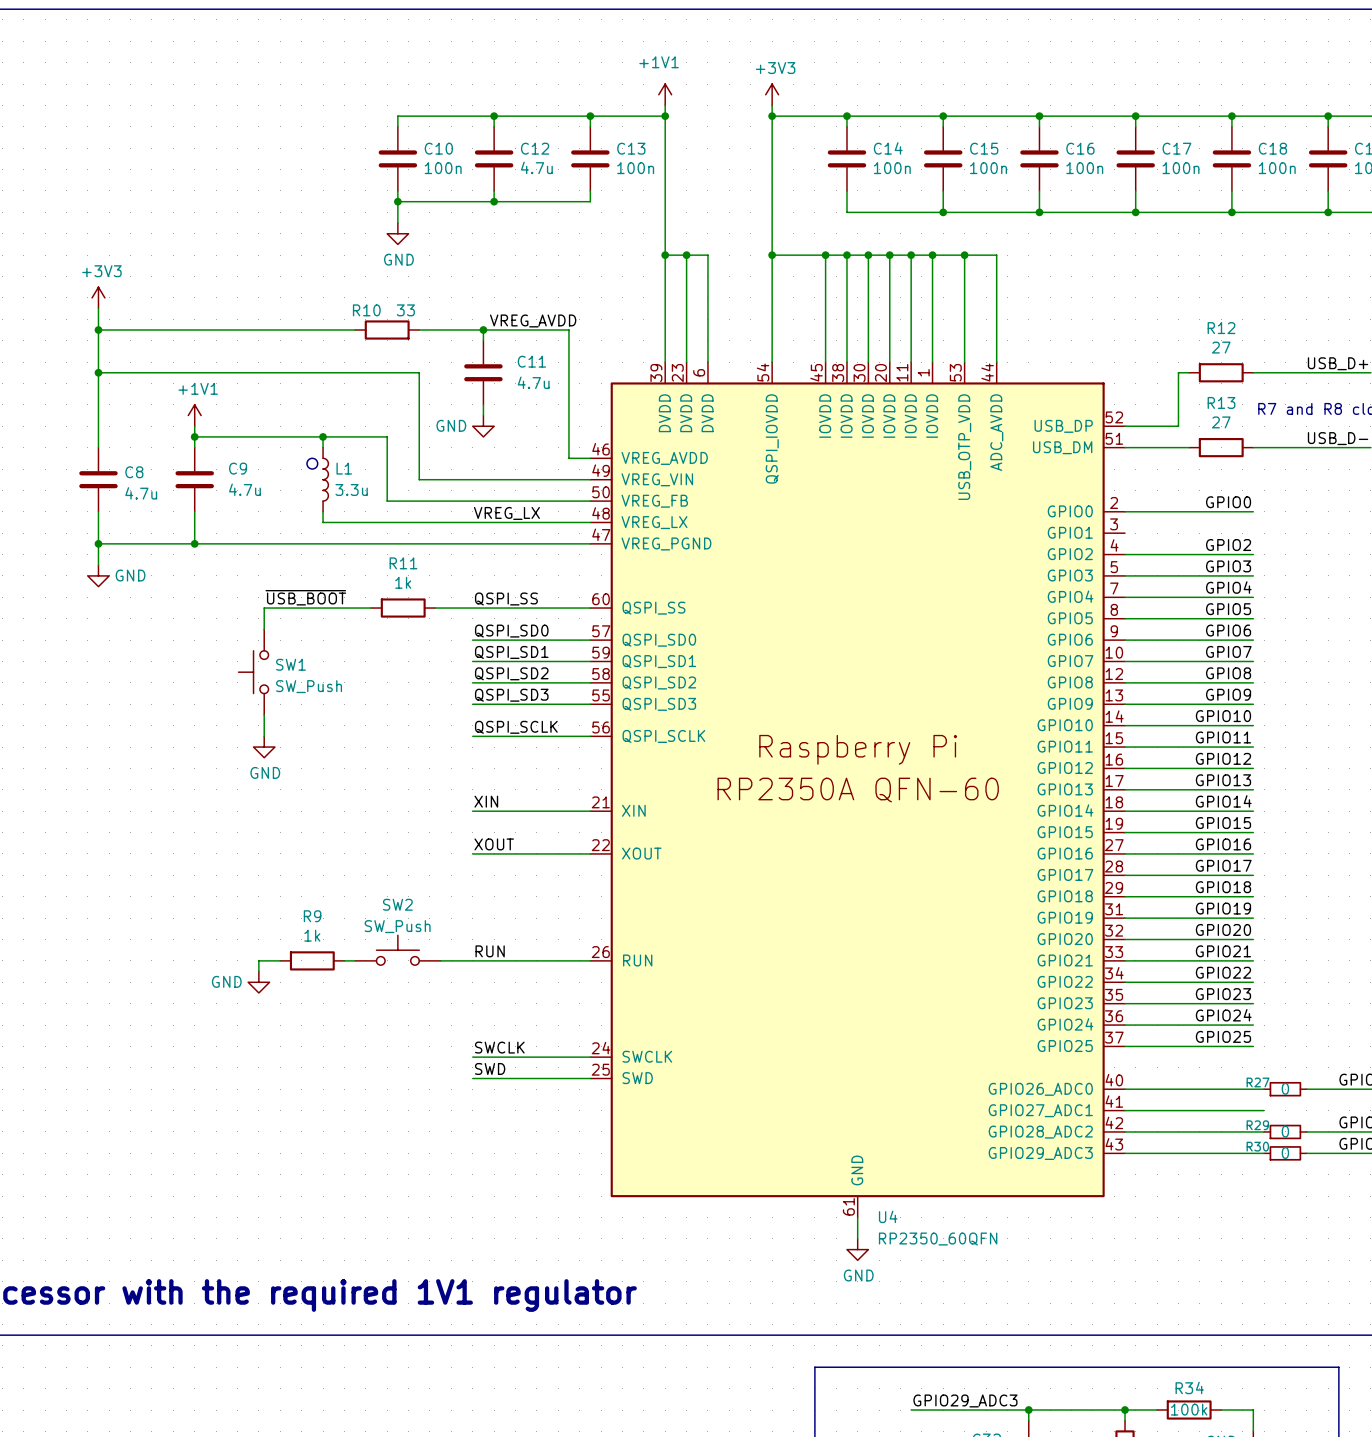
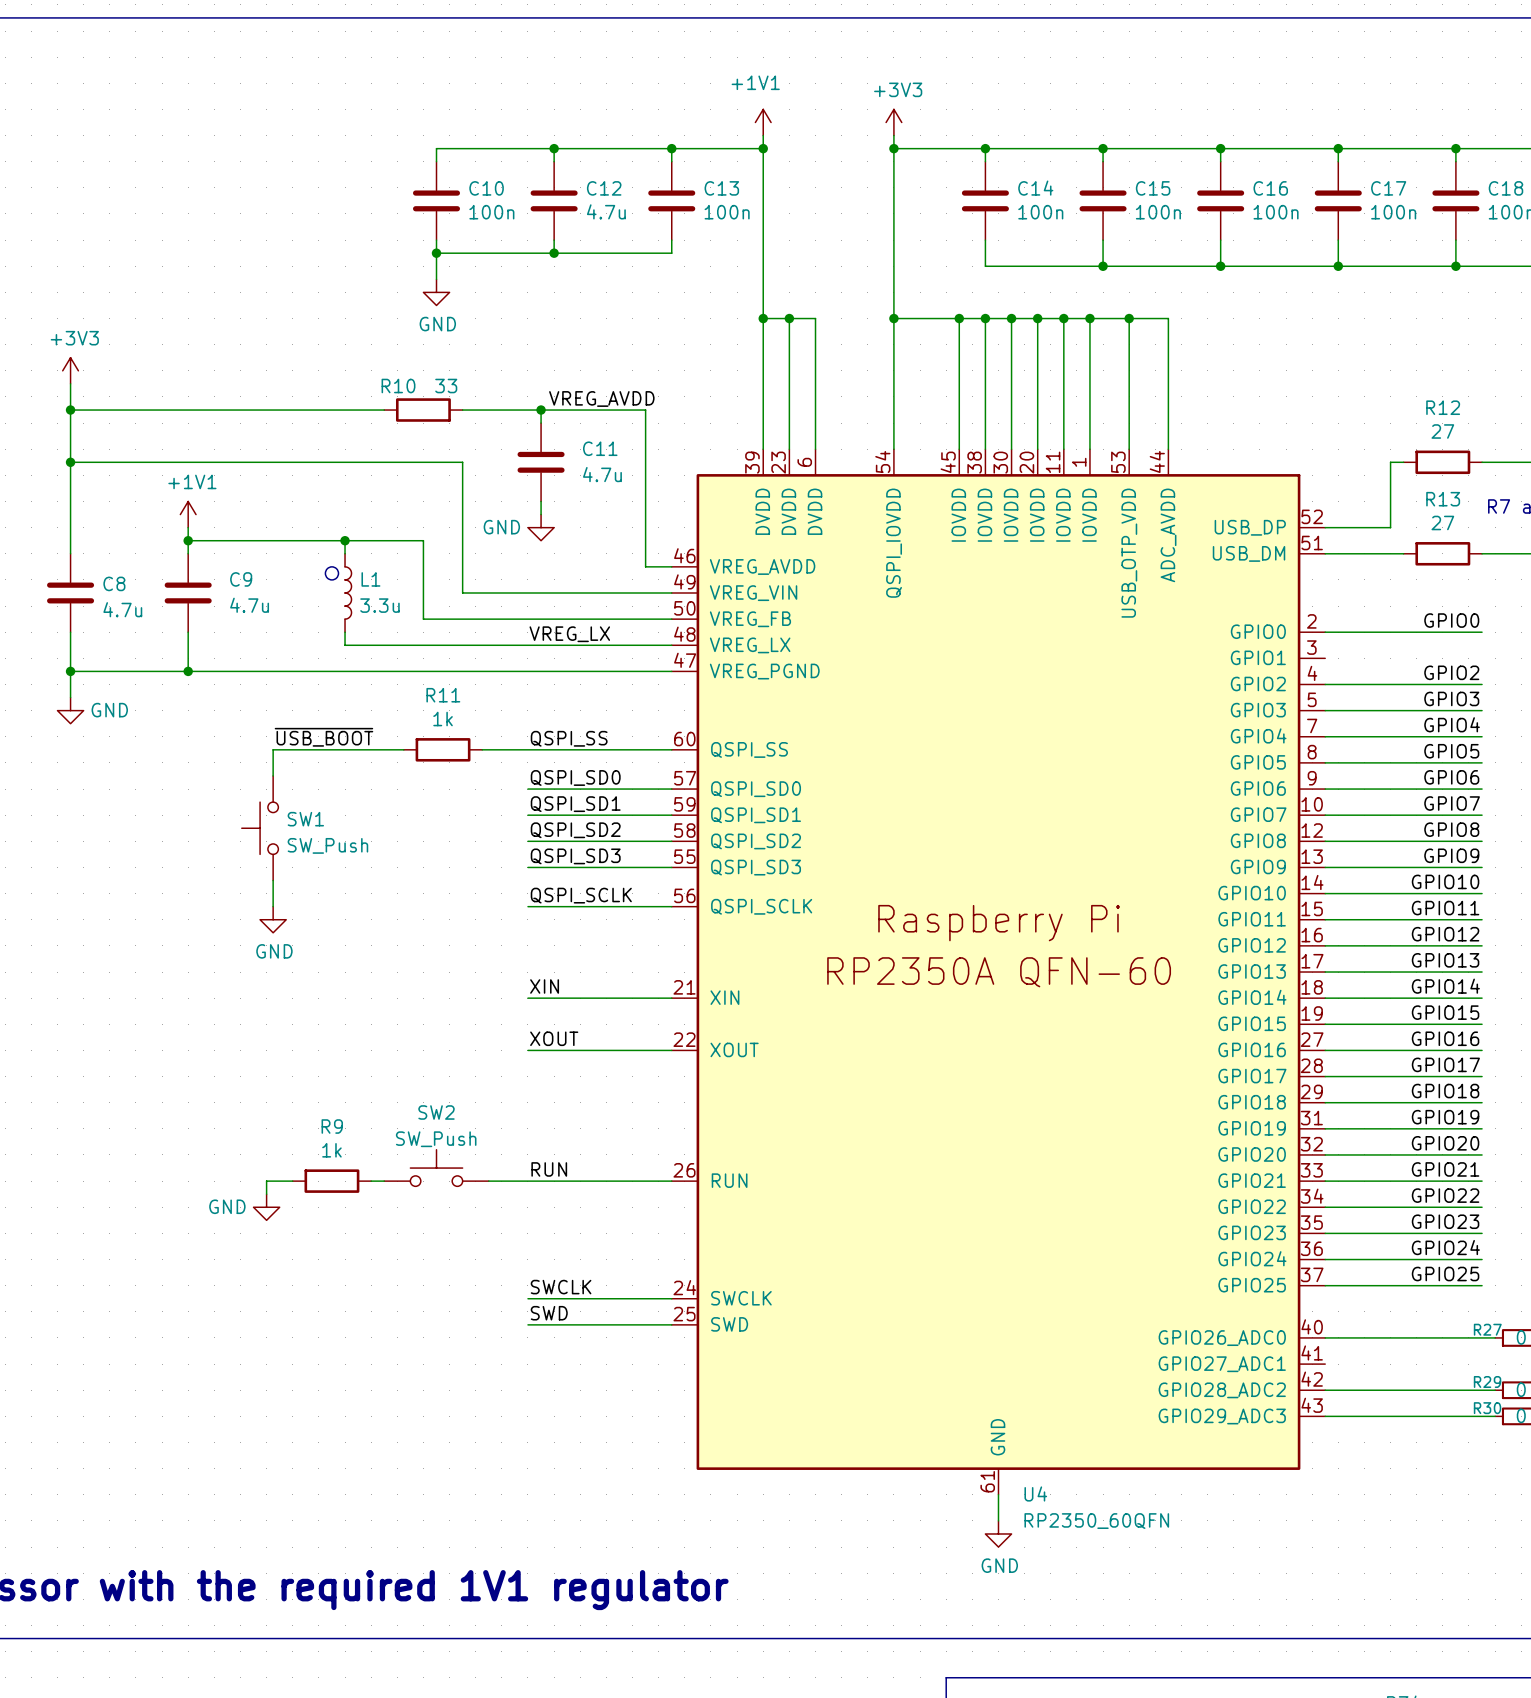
wire: (1125, 1110) (1264, 1110) -> none

